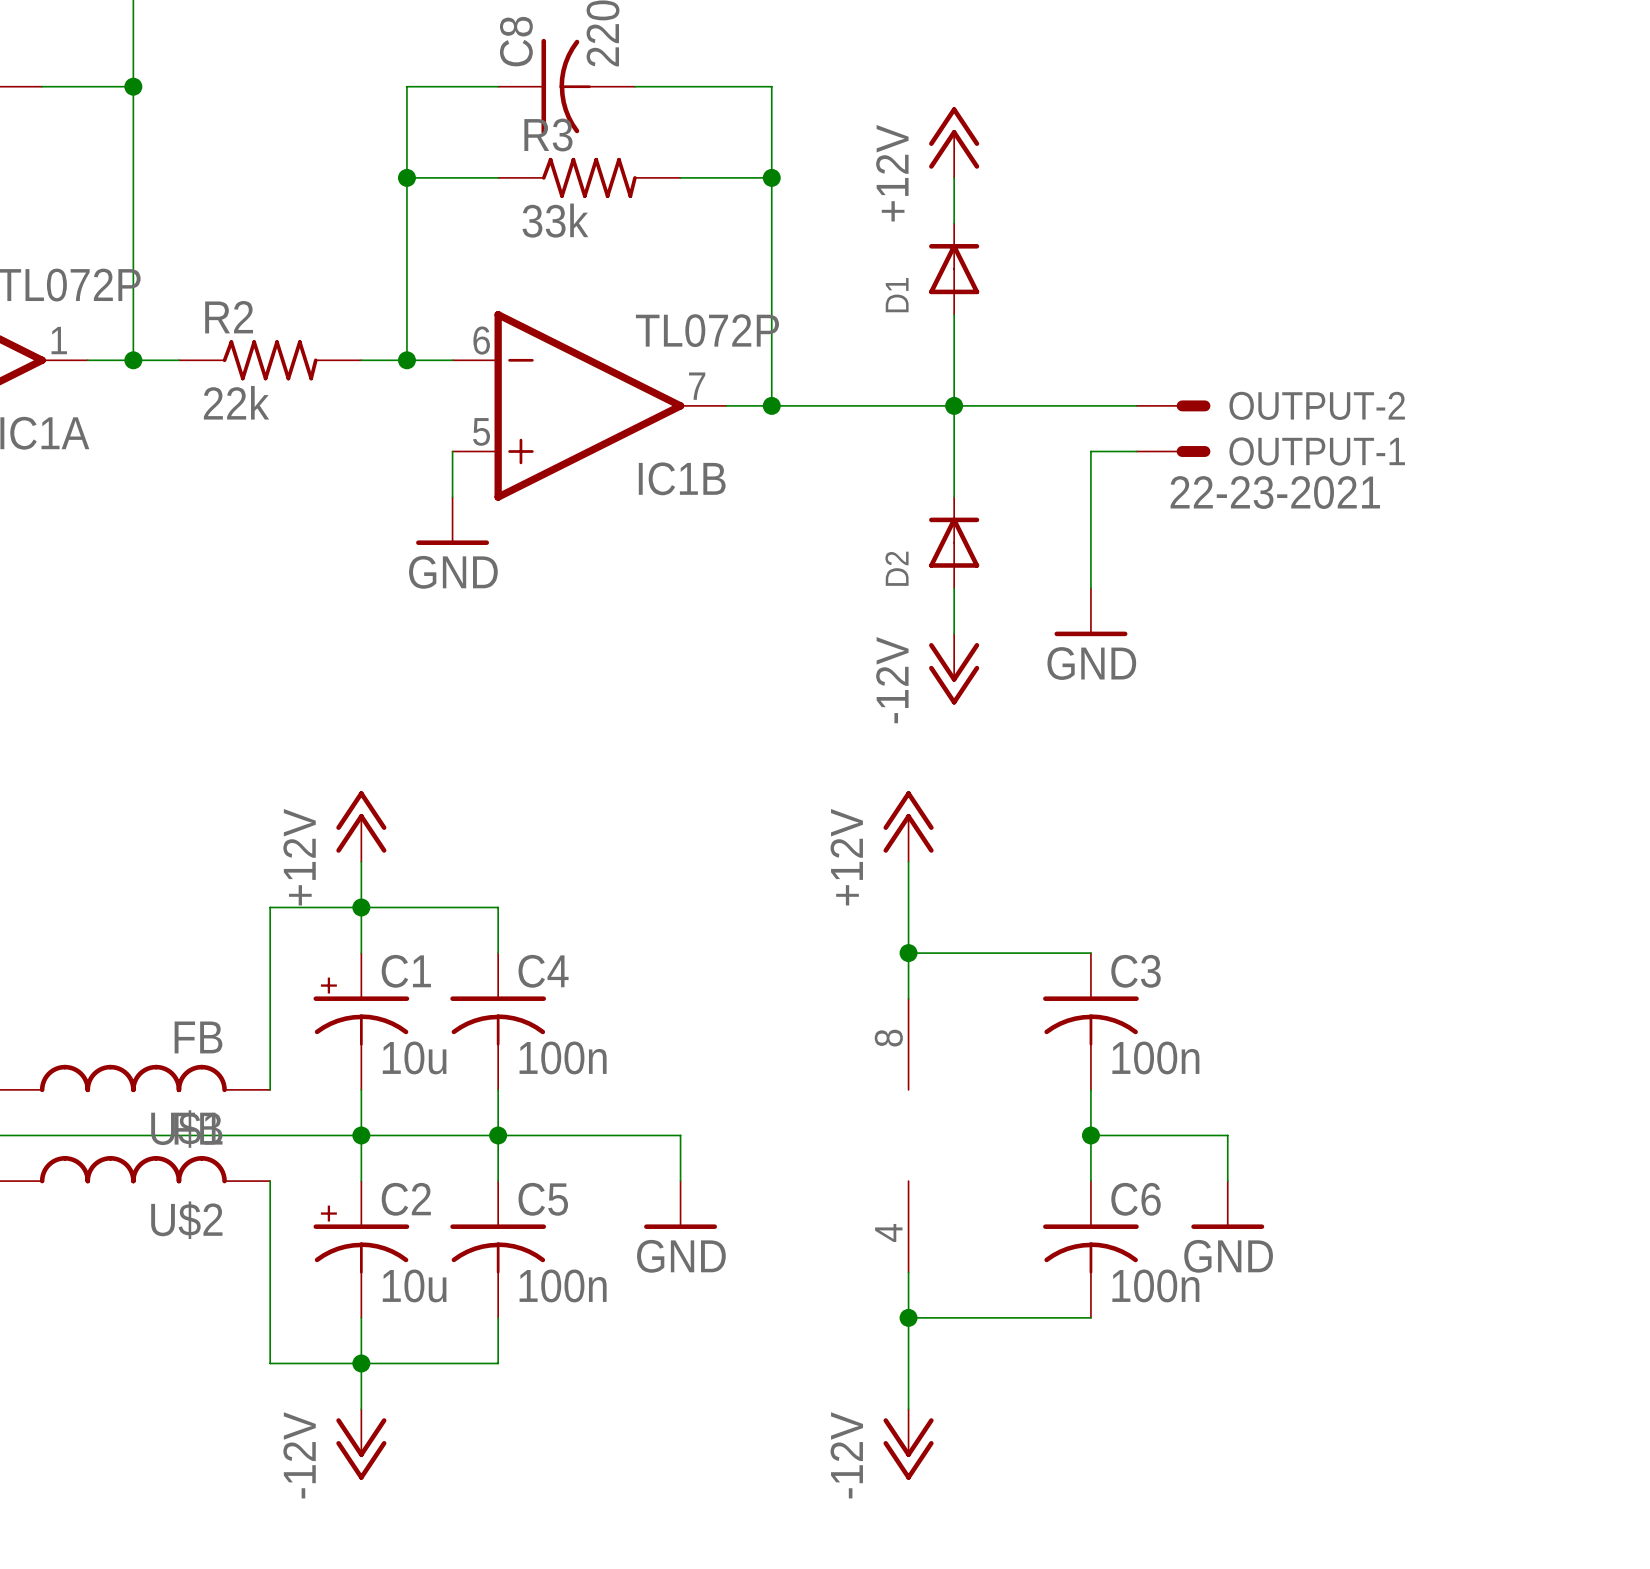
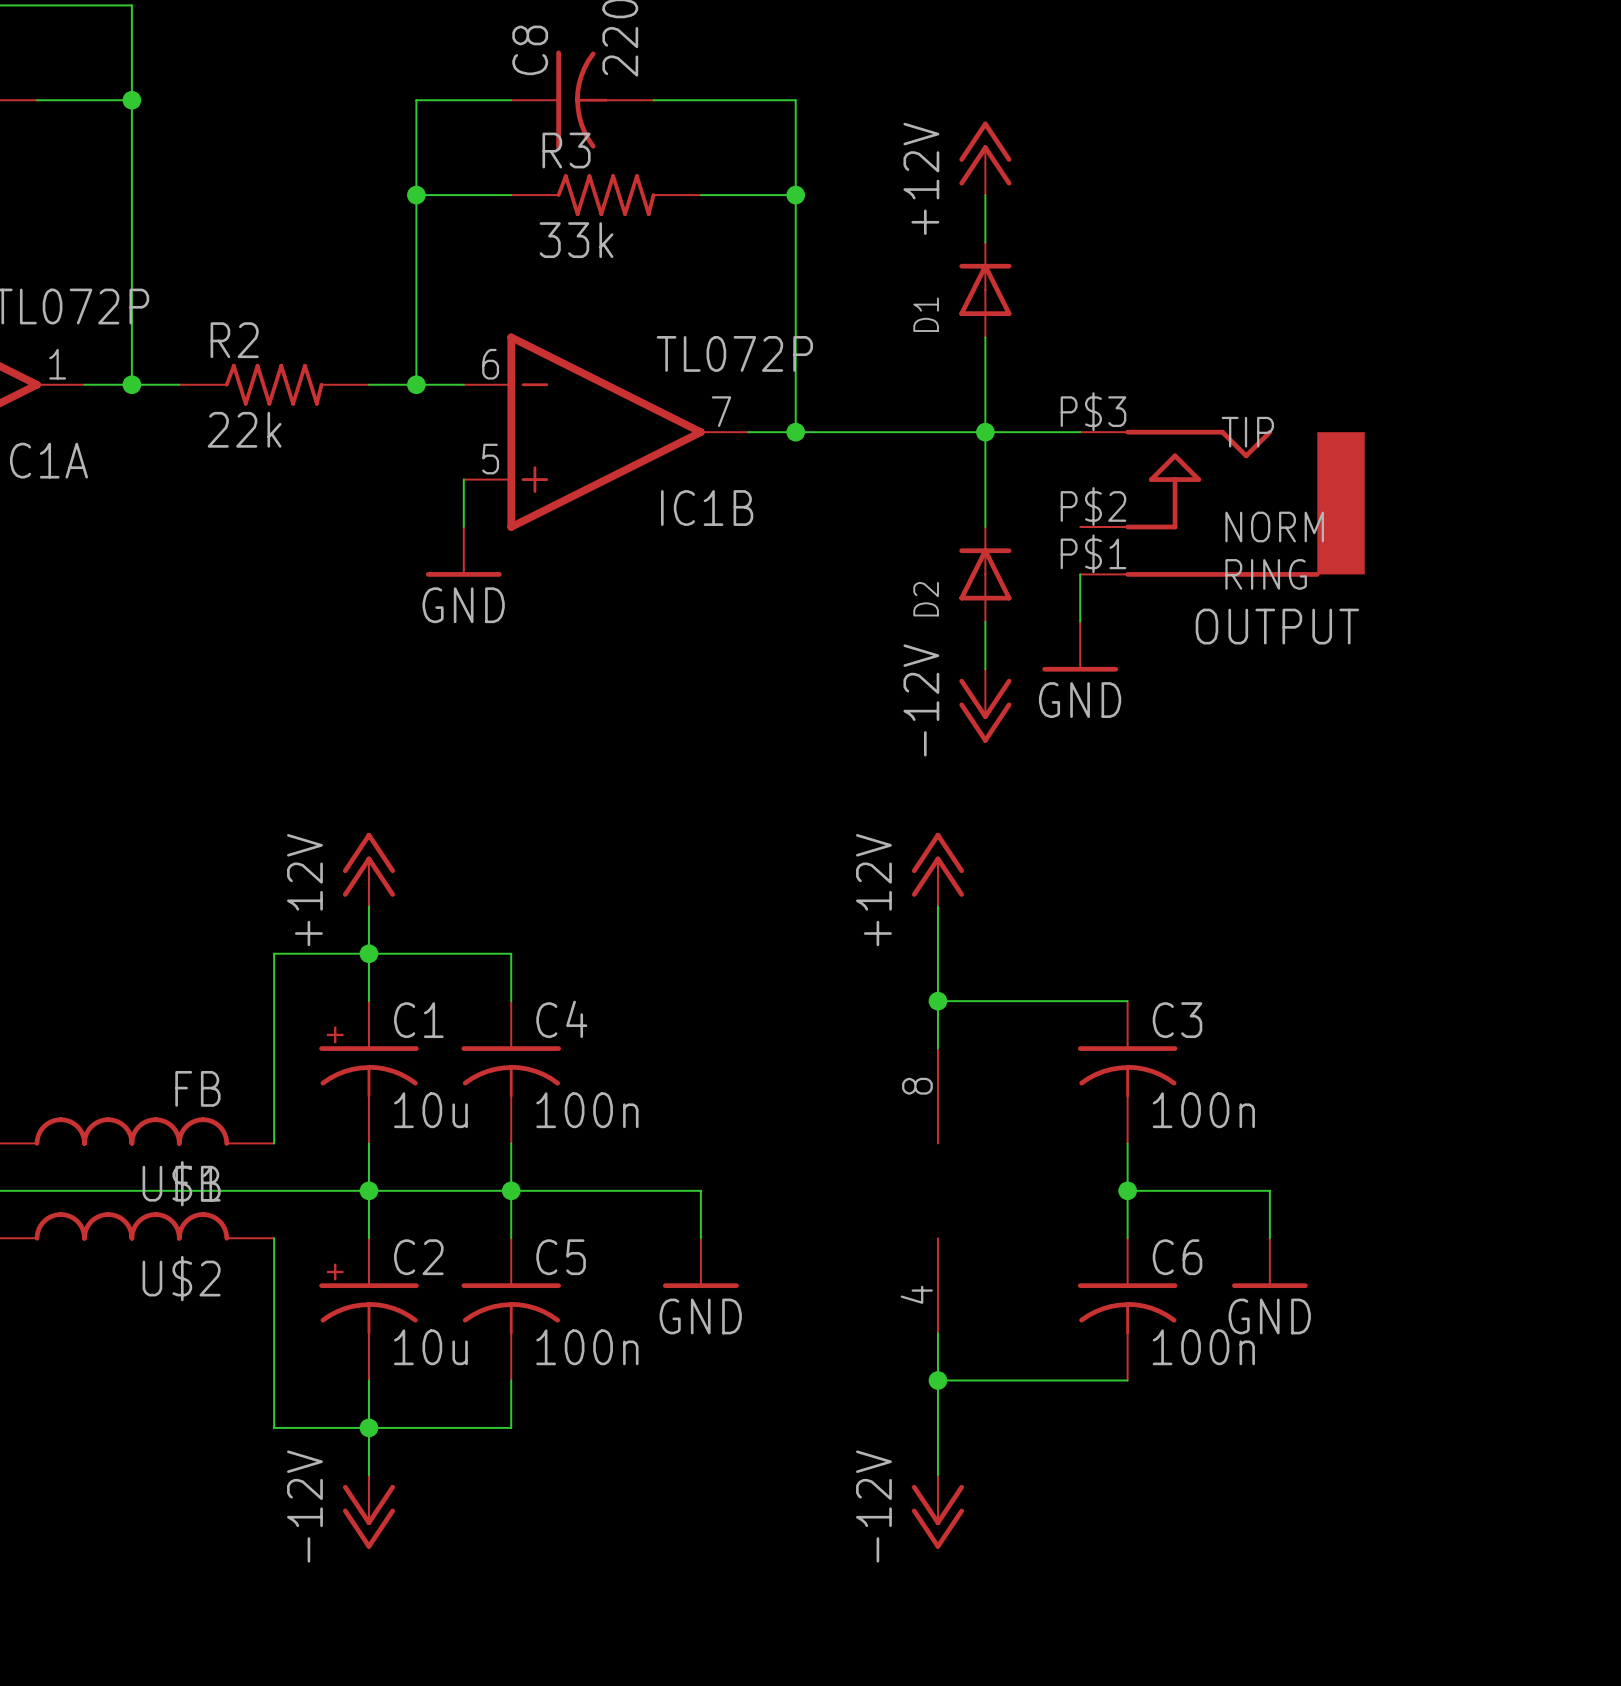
OUTPUT-2: (1173, 405) -> none
wire: (1136, 451) (1090, 451) (1090, 588) -> none
OUTPUT-1: 22-23-2021 (1173, 451) -> none
OUTPUT: none -> (1222, 503)
wire: none -> (1080, 574) (1080, 621)
power symbol position: GND (1090, 612) -> GND (1080, 646)

